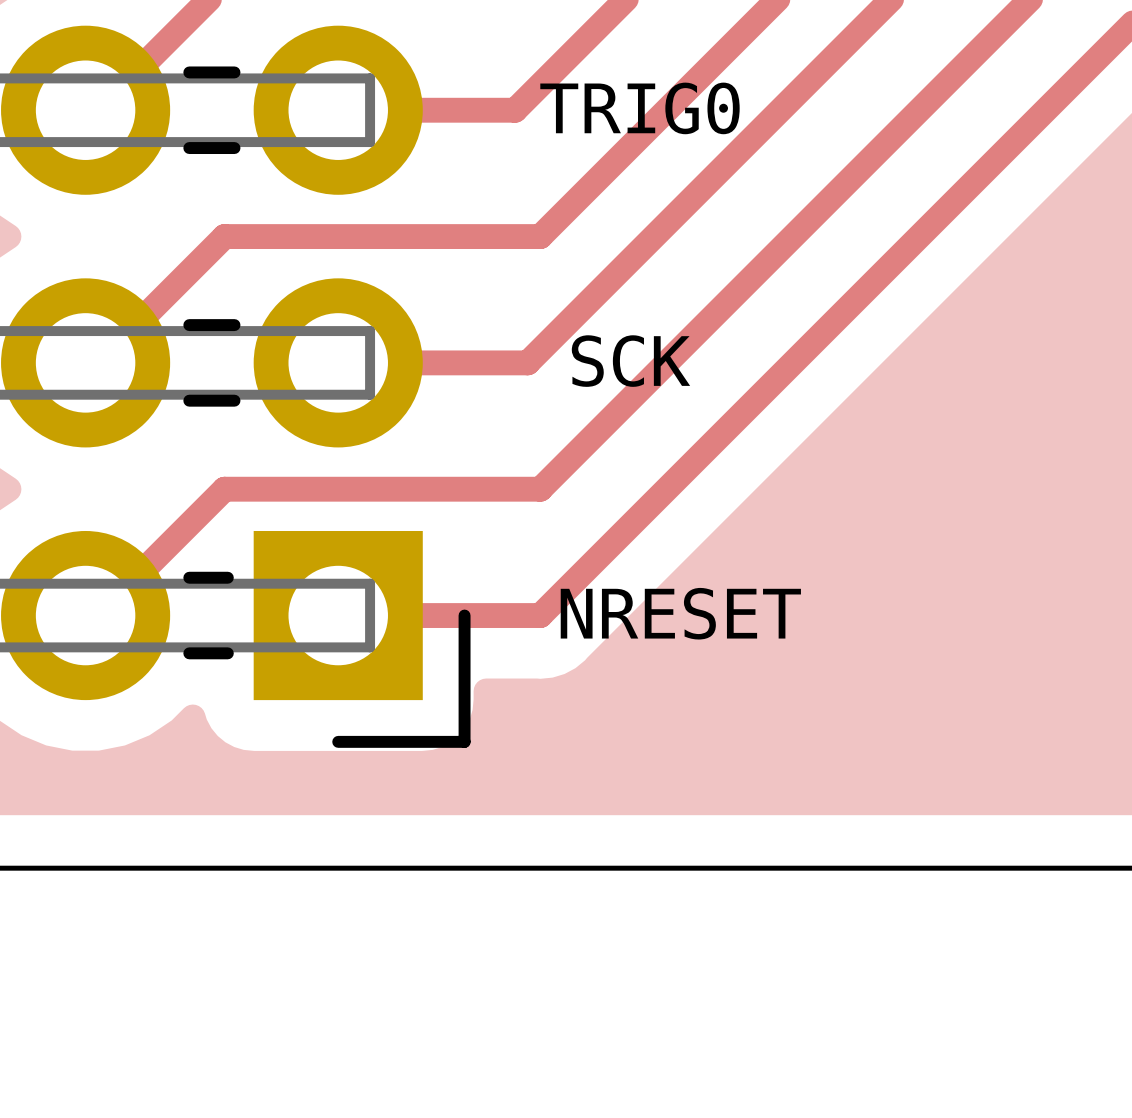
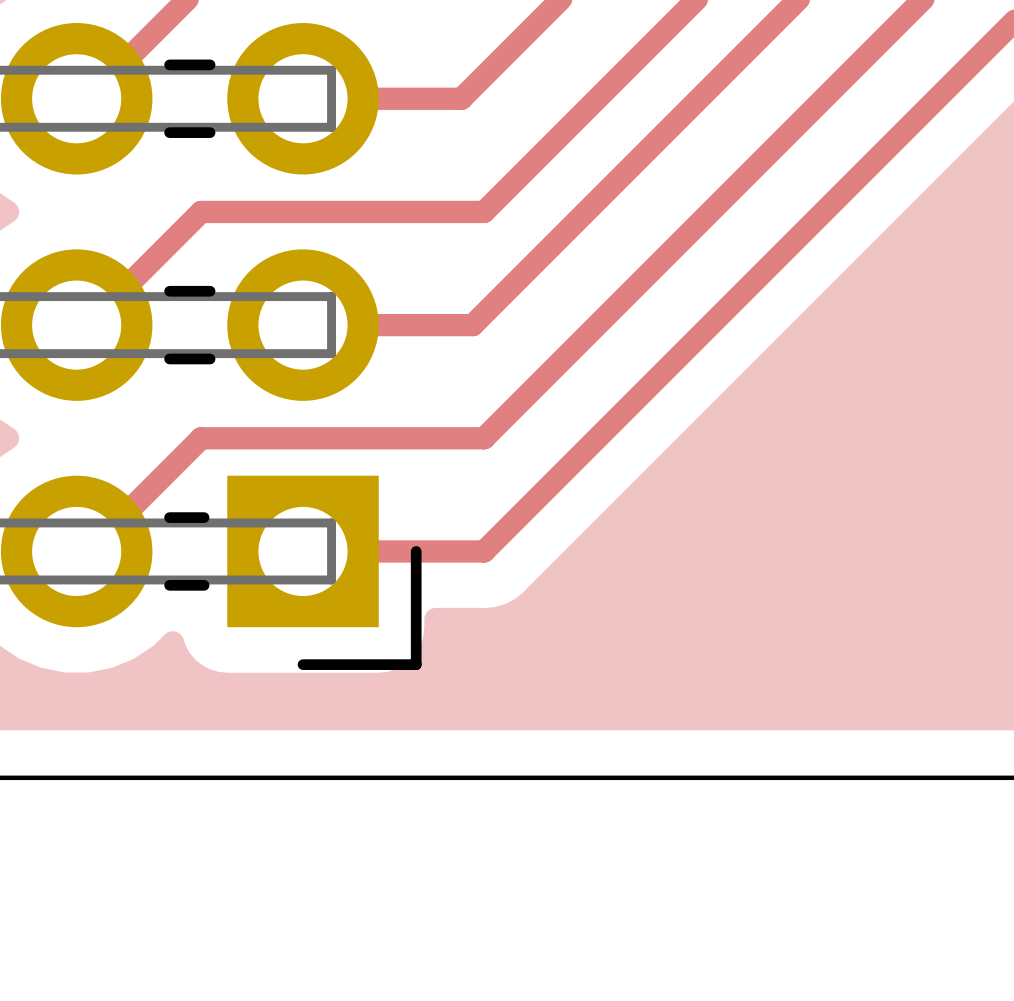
text: TRIG0 (639, 108) -> none
text: SCK (630, 361) -> none
text: NRESET (680, 613) -> none

